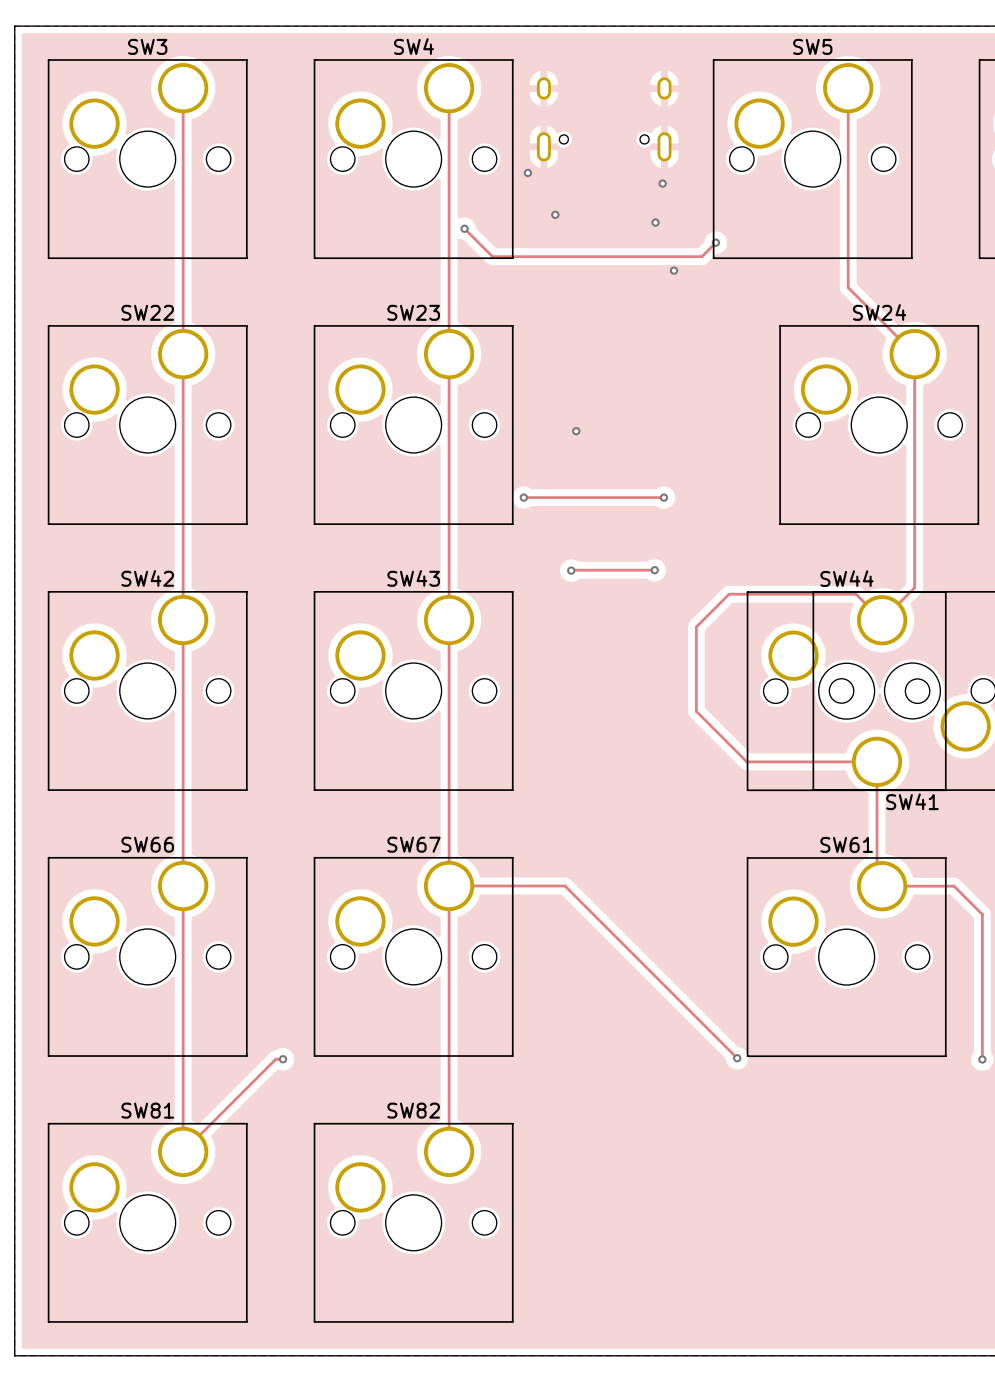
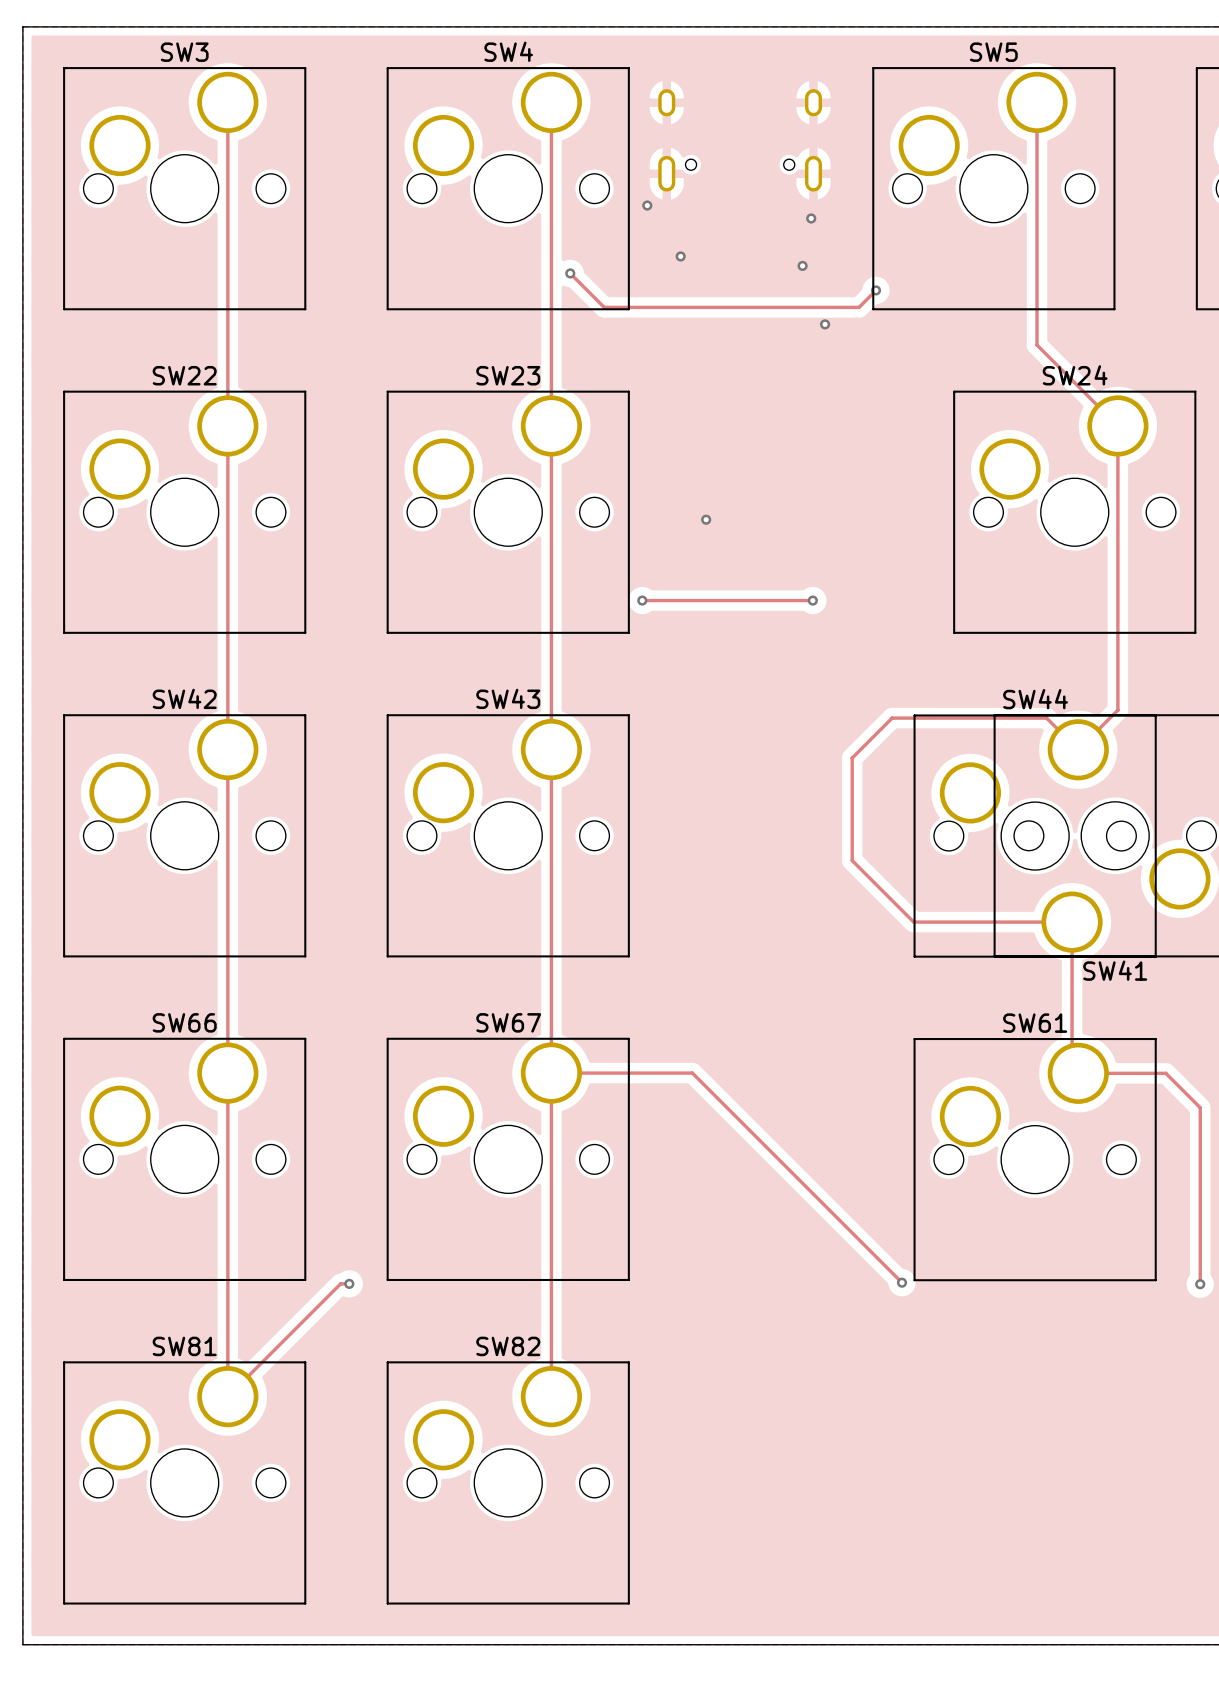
via: (571, 570) -> none
track: (654, 570) (571, 570) -> none
via: (654, 570) -> none

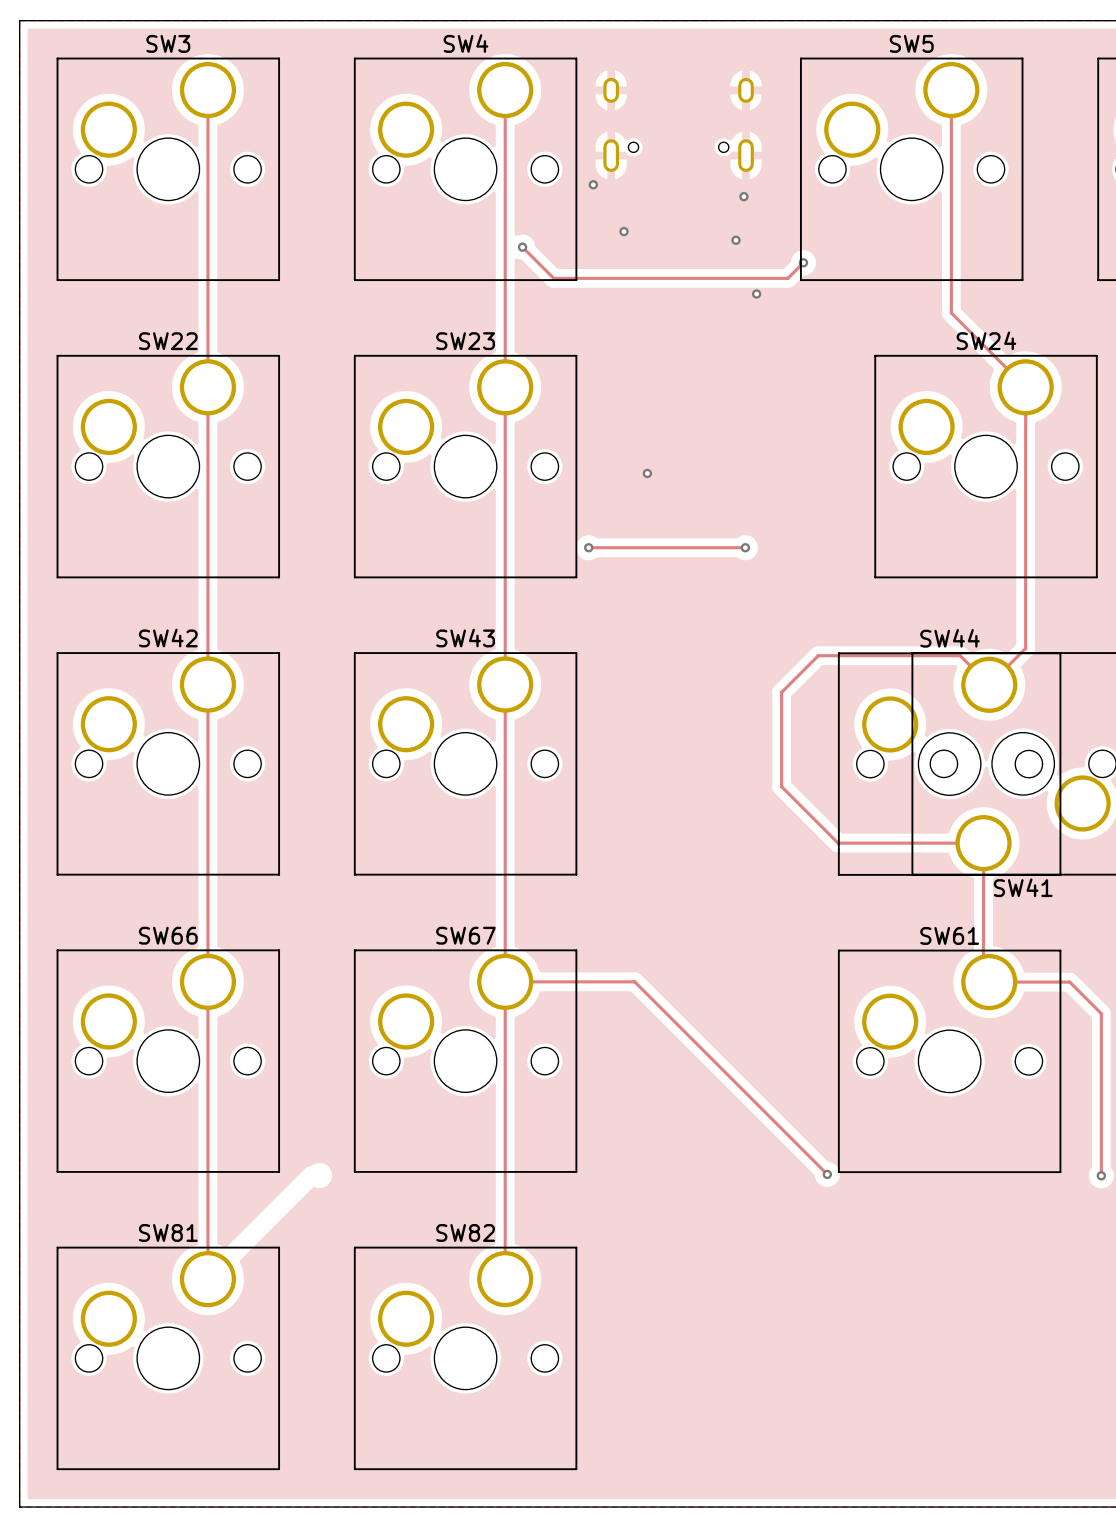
track: (349, 1283) (340, 1283) (227, 1396) -> none
via: (349, 1283) -> none

